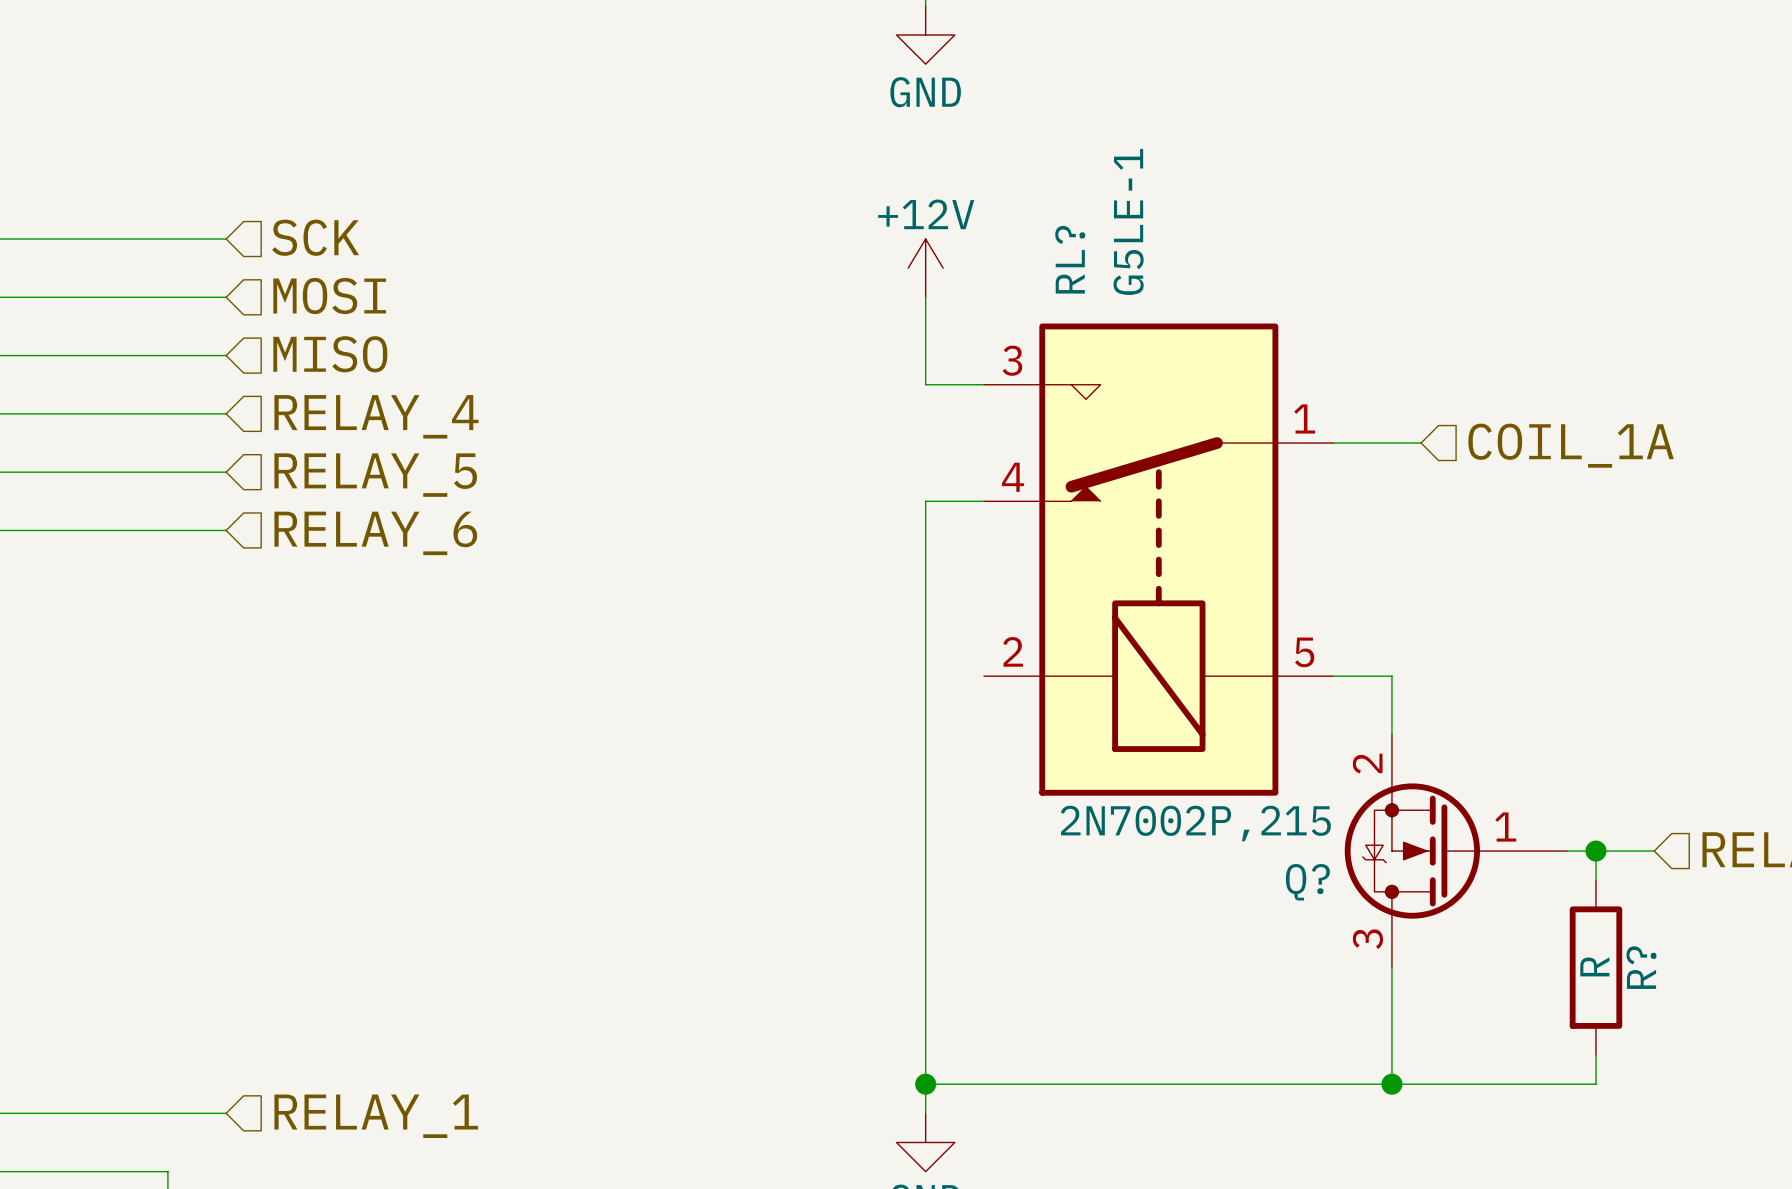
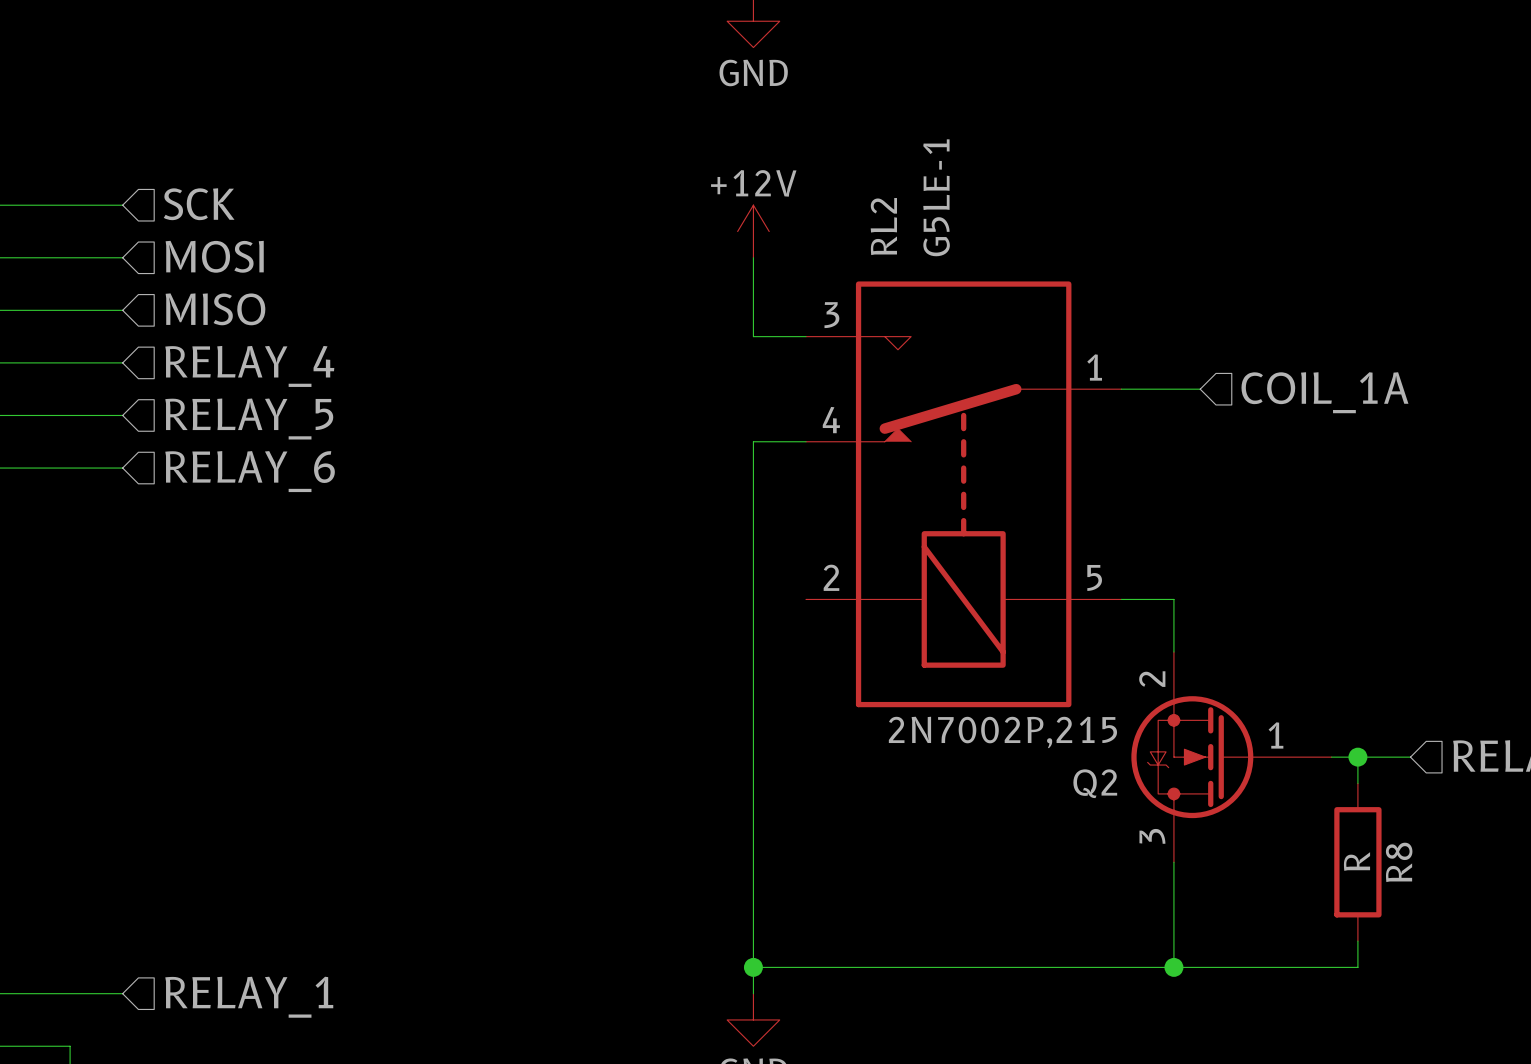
RL? name: RL? (1070, 259) -> RL2 (883, 226)
Q? name: Q? (1307, 882) -> Q2 (1095, 783)
R? name: R? (1641, 967) -> R8 (1399, 862)

